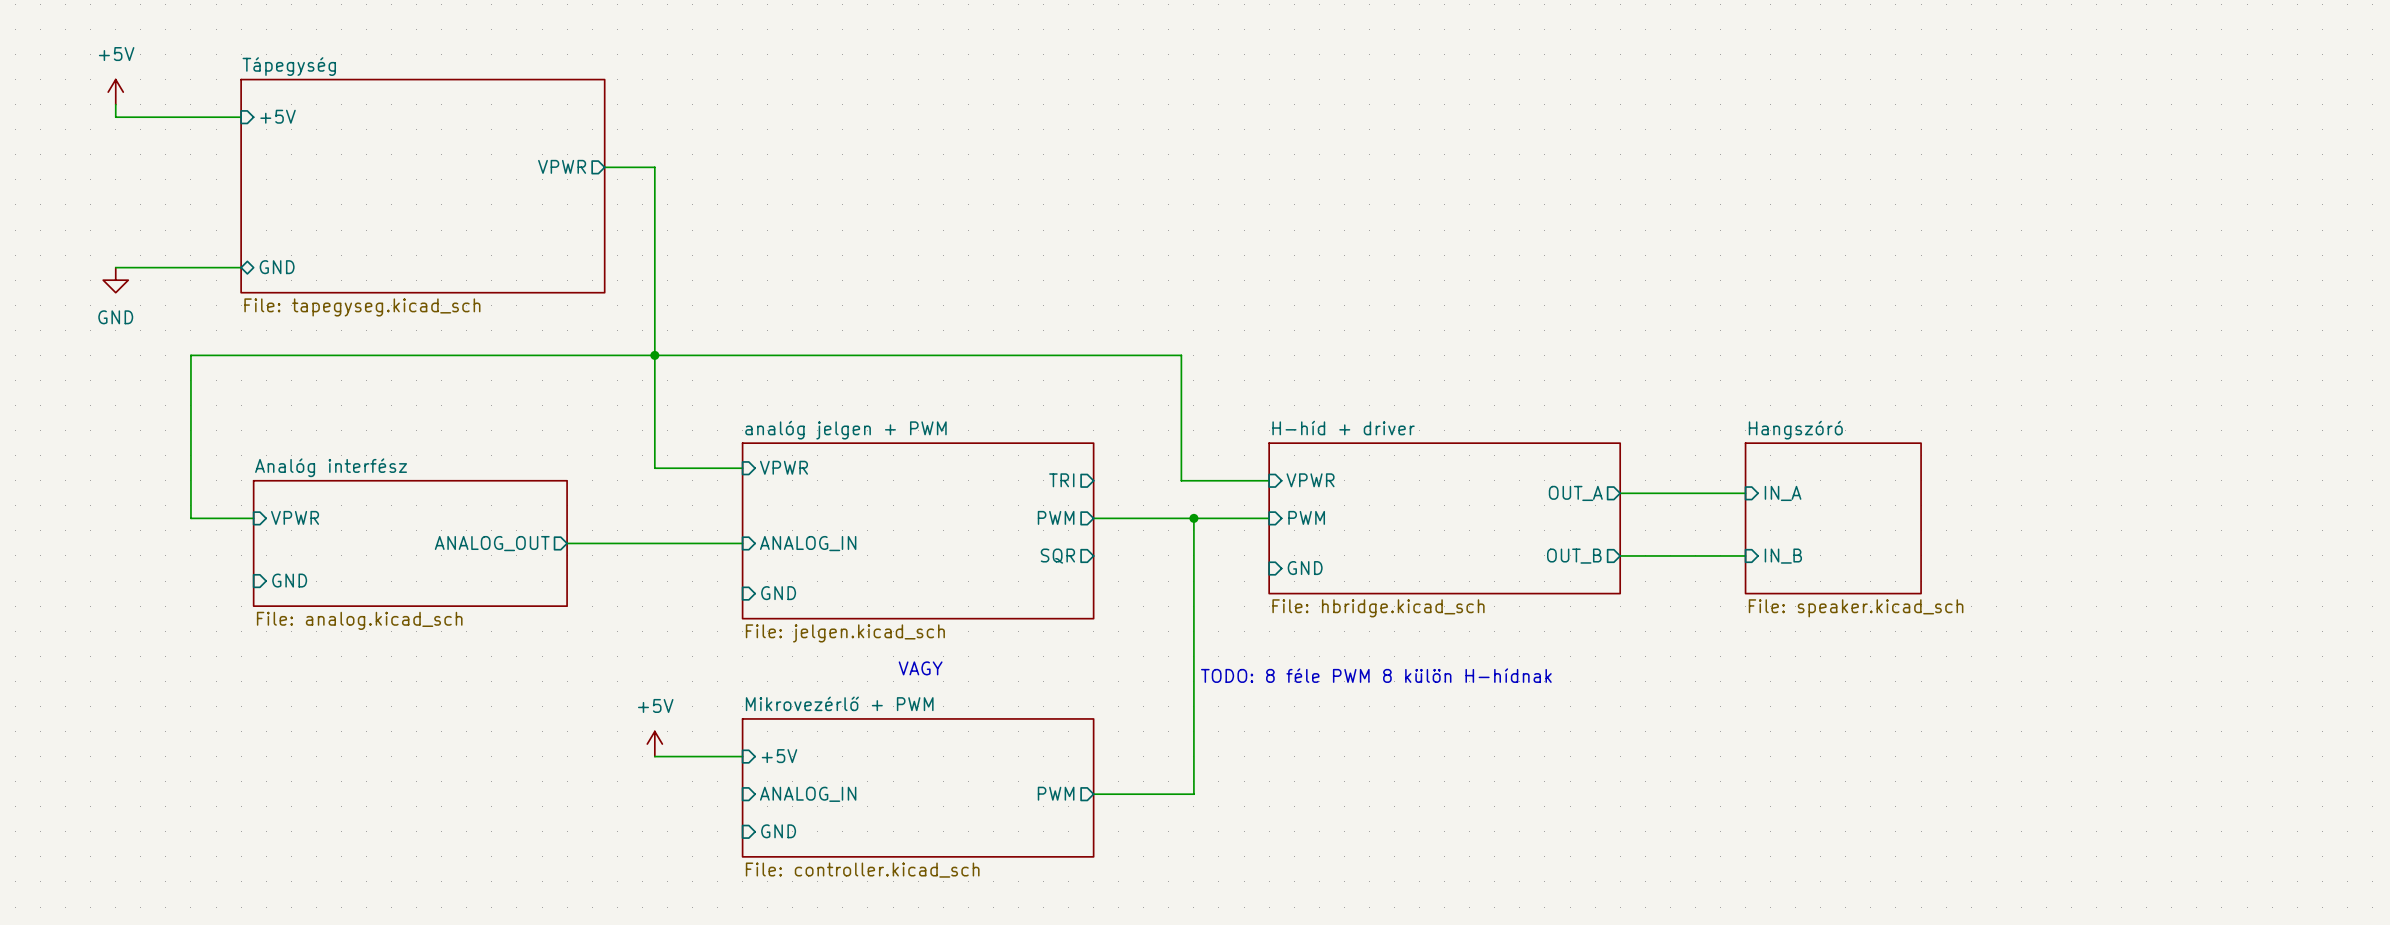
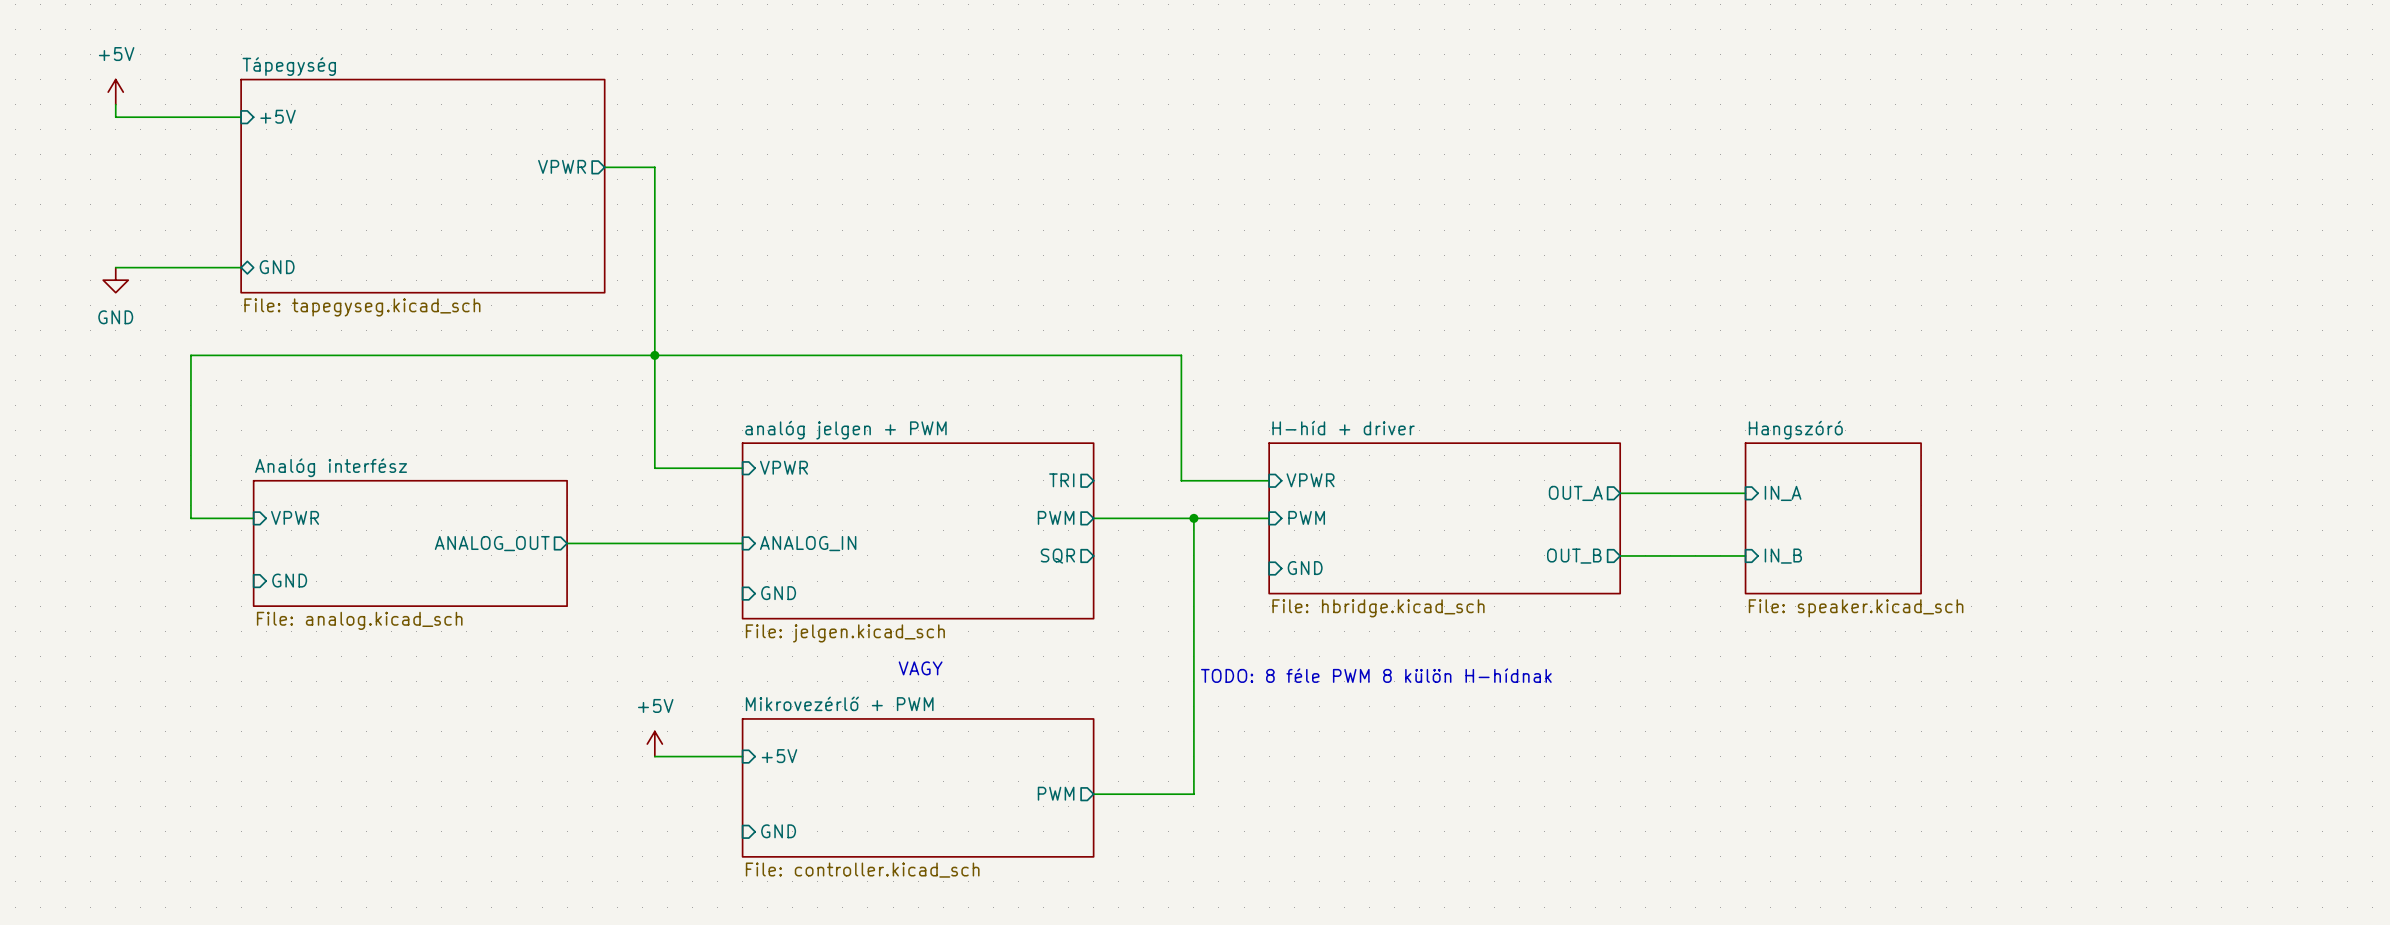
sheet pin: ANALOG_IN (808, 794) -> none

